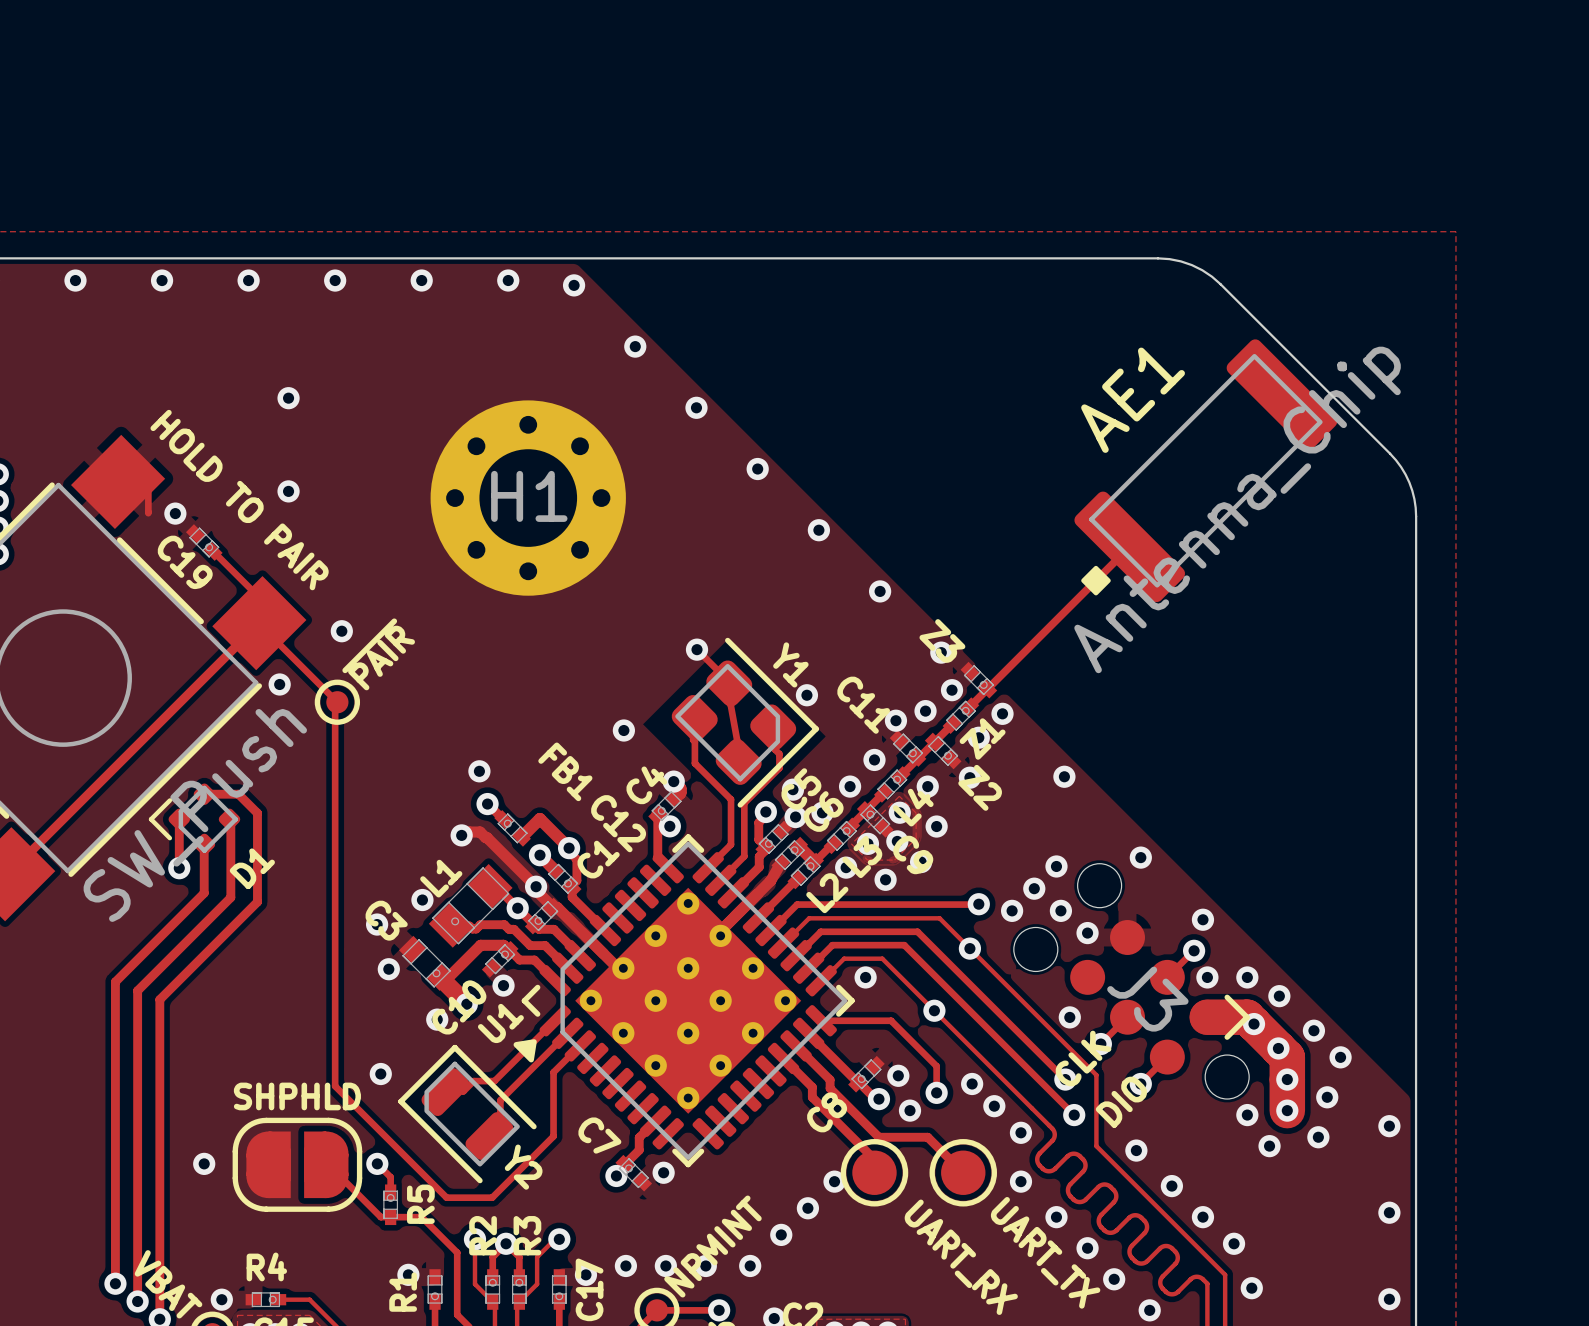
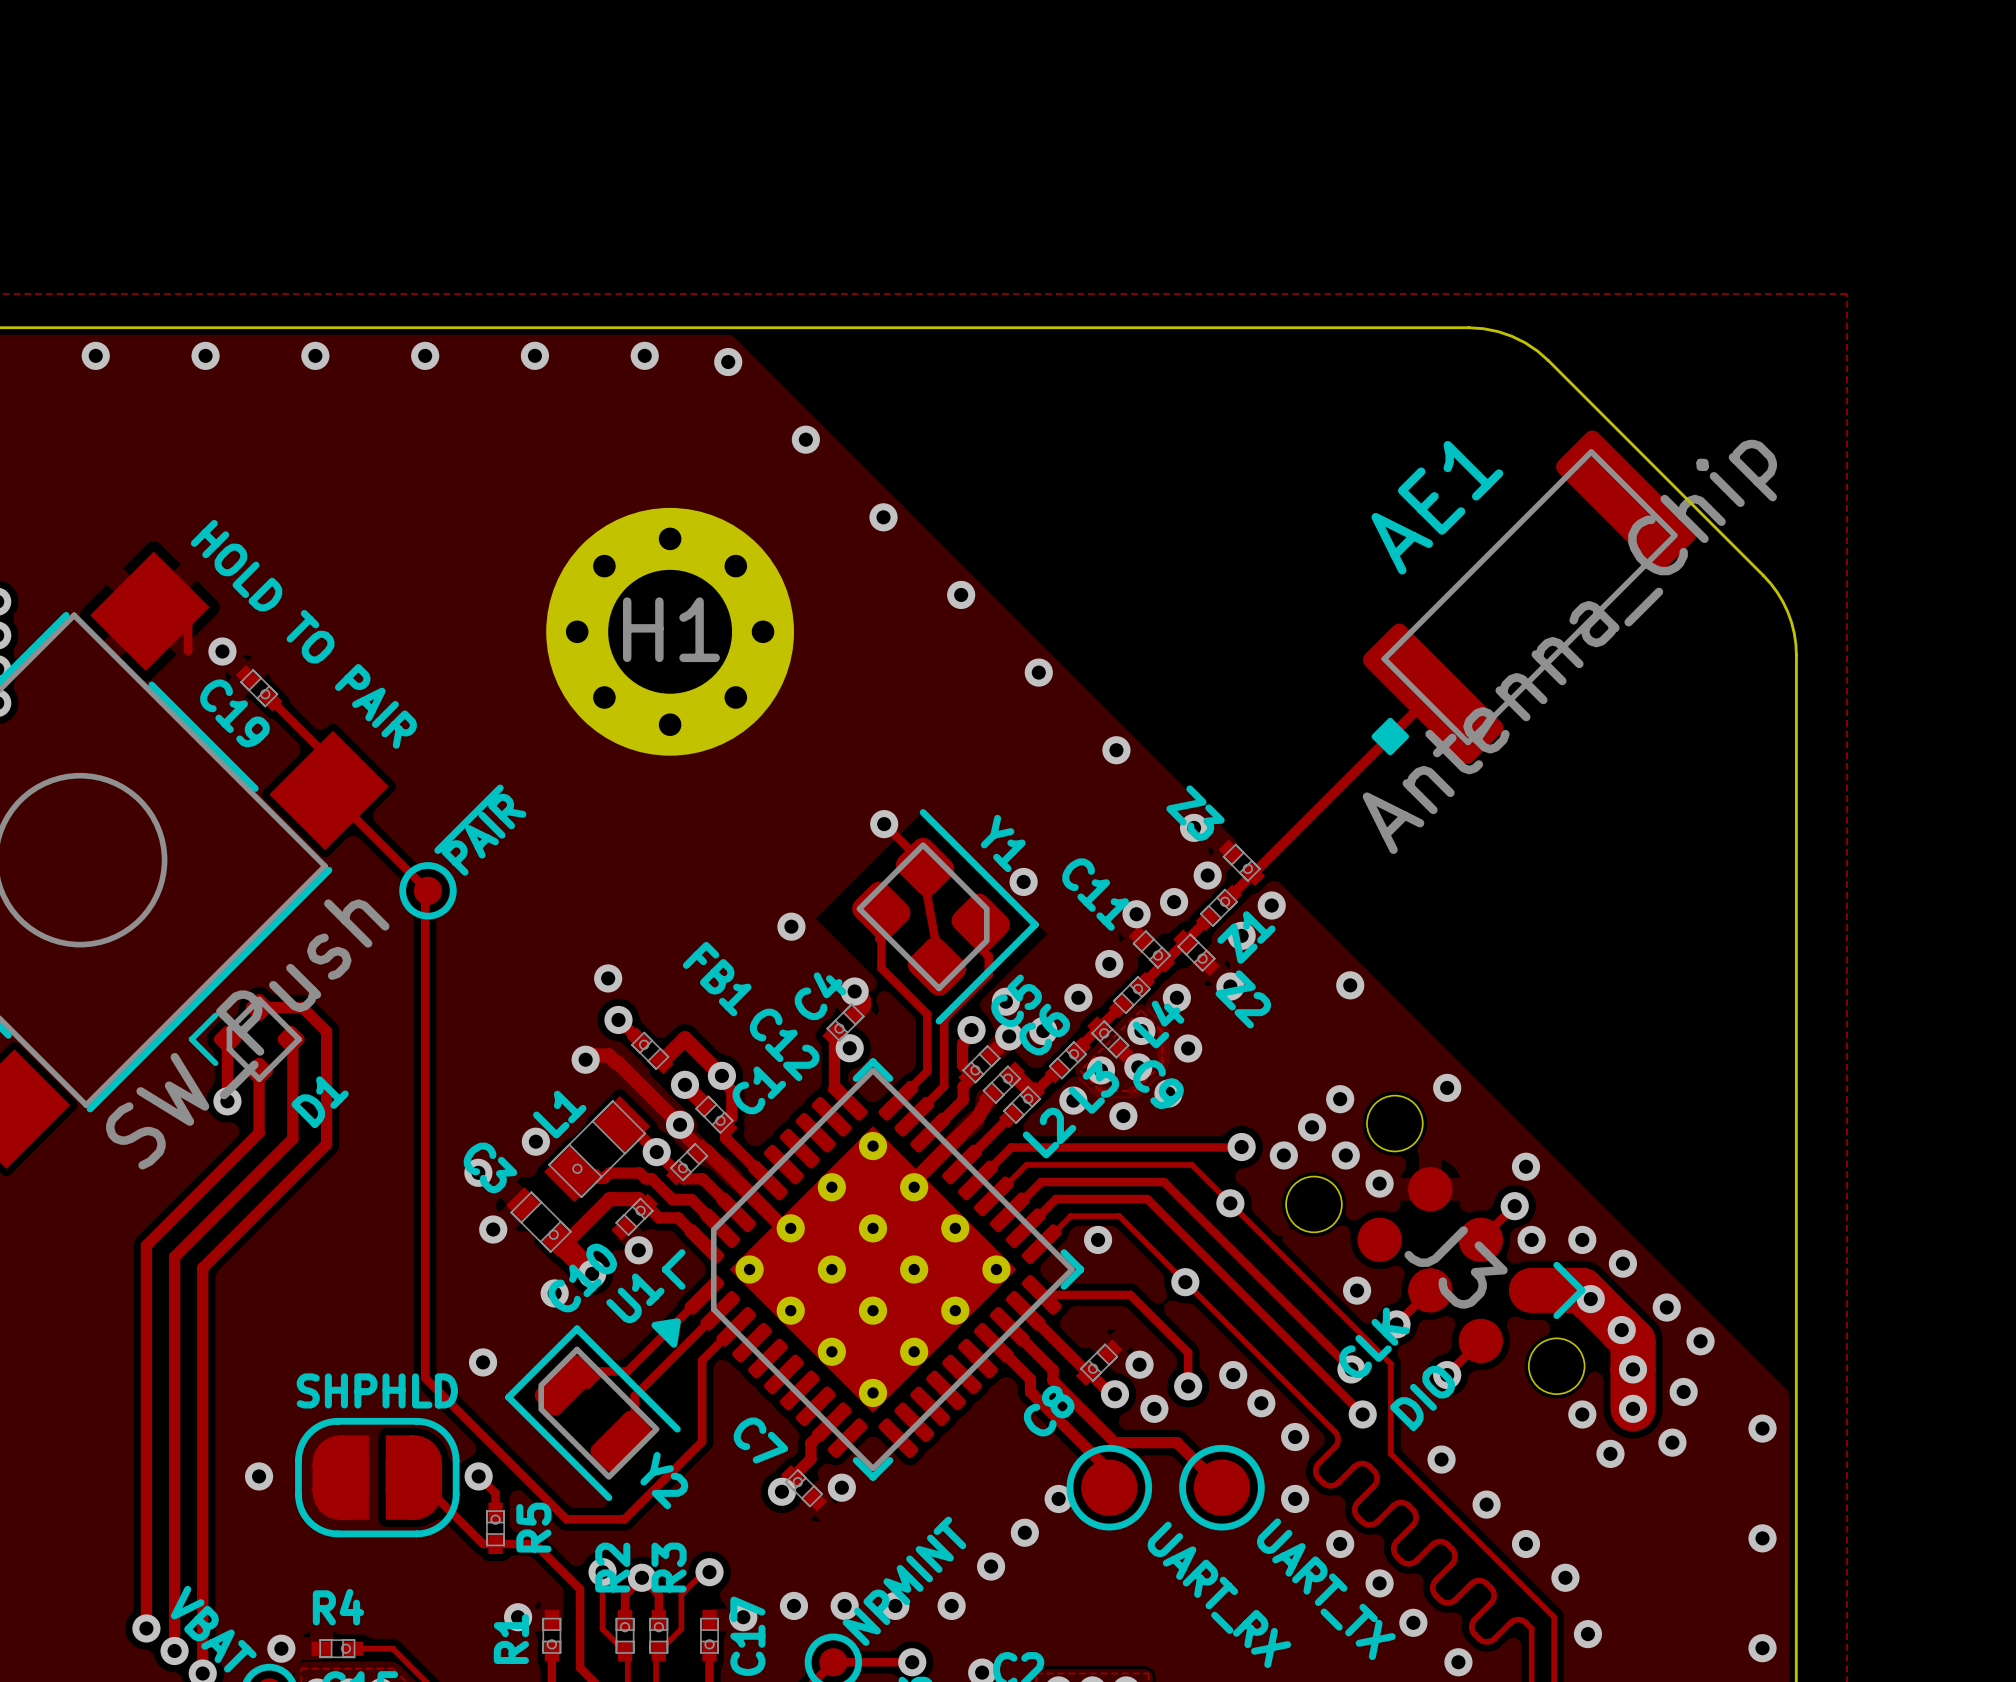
via: (288, 398) -> none
via: (288, 491) -> none
track: (259, 623) (8, 874) -> none
via: (341, 631) -> none
via: (279, 684) -> none

